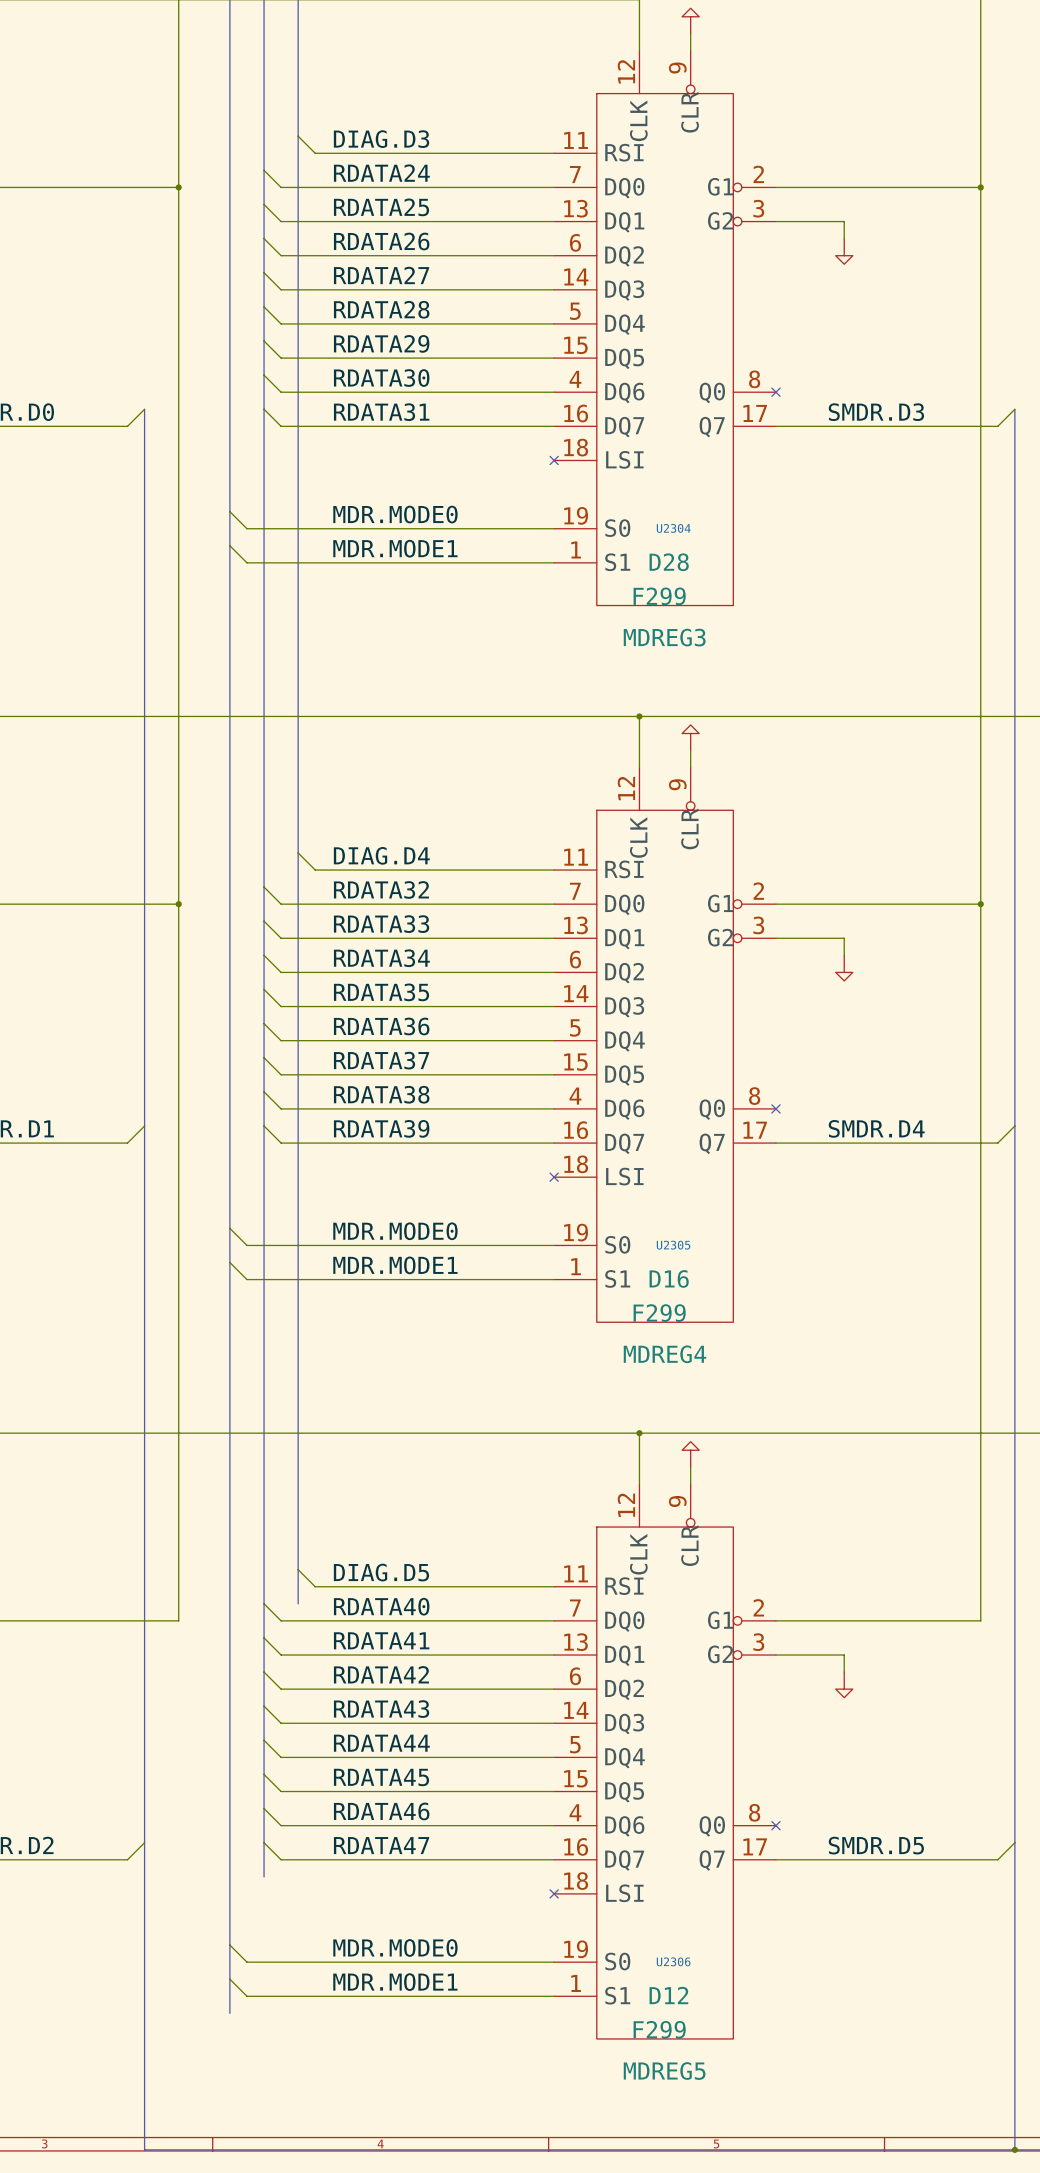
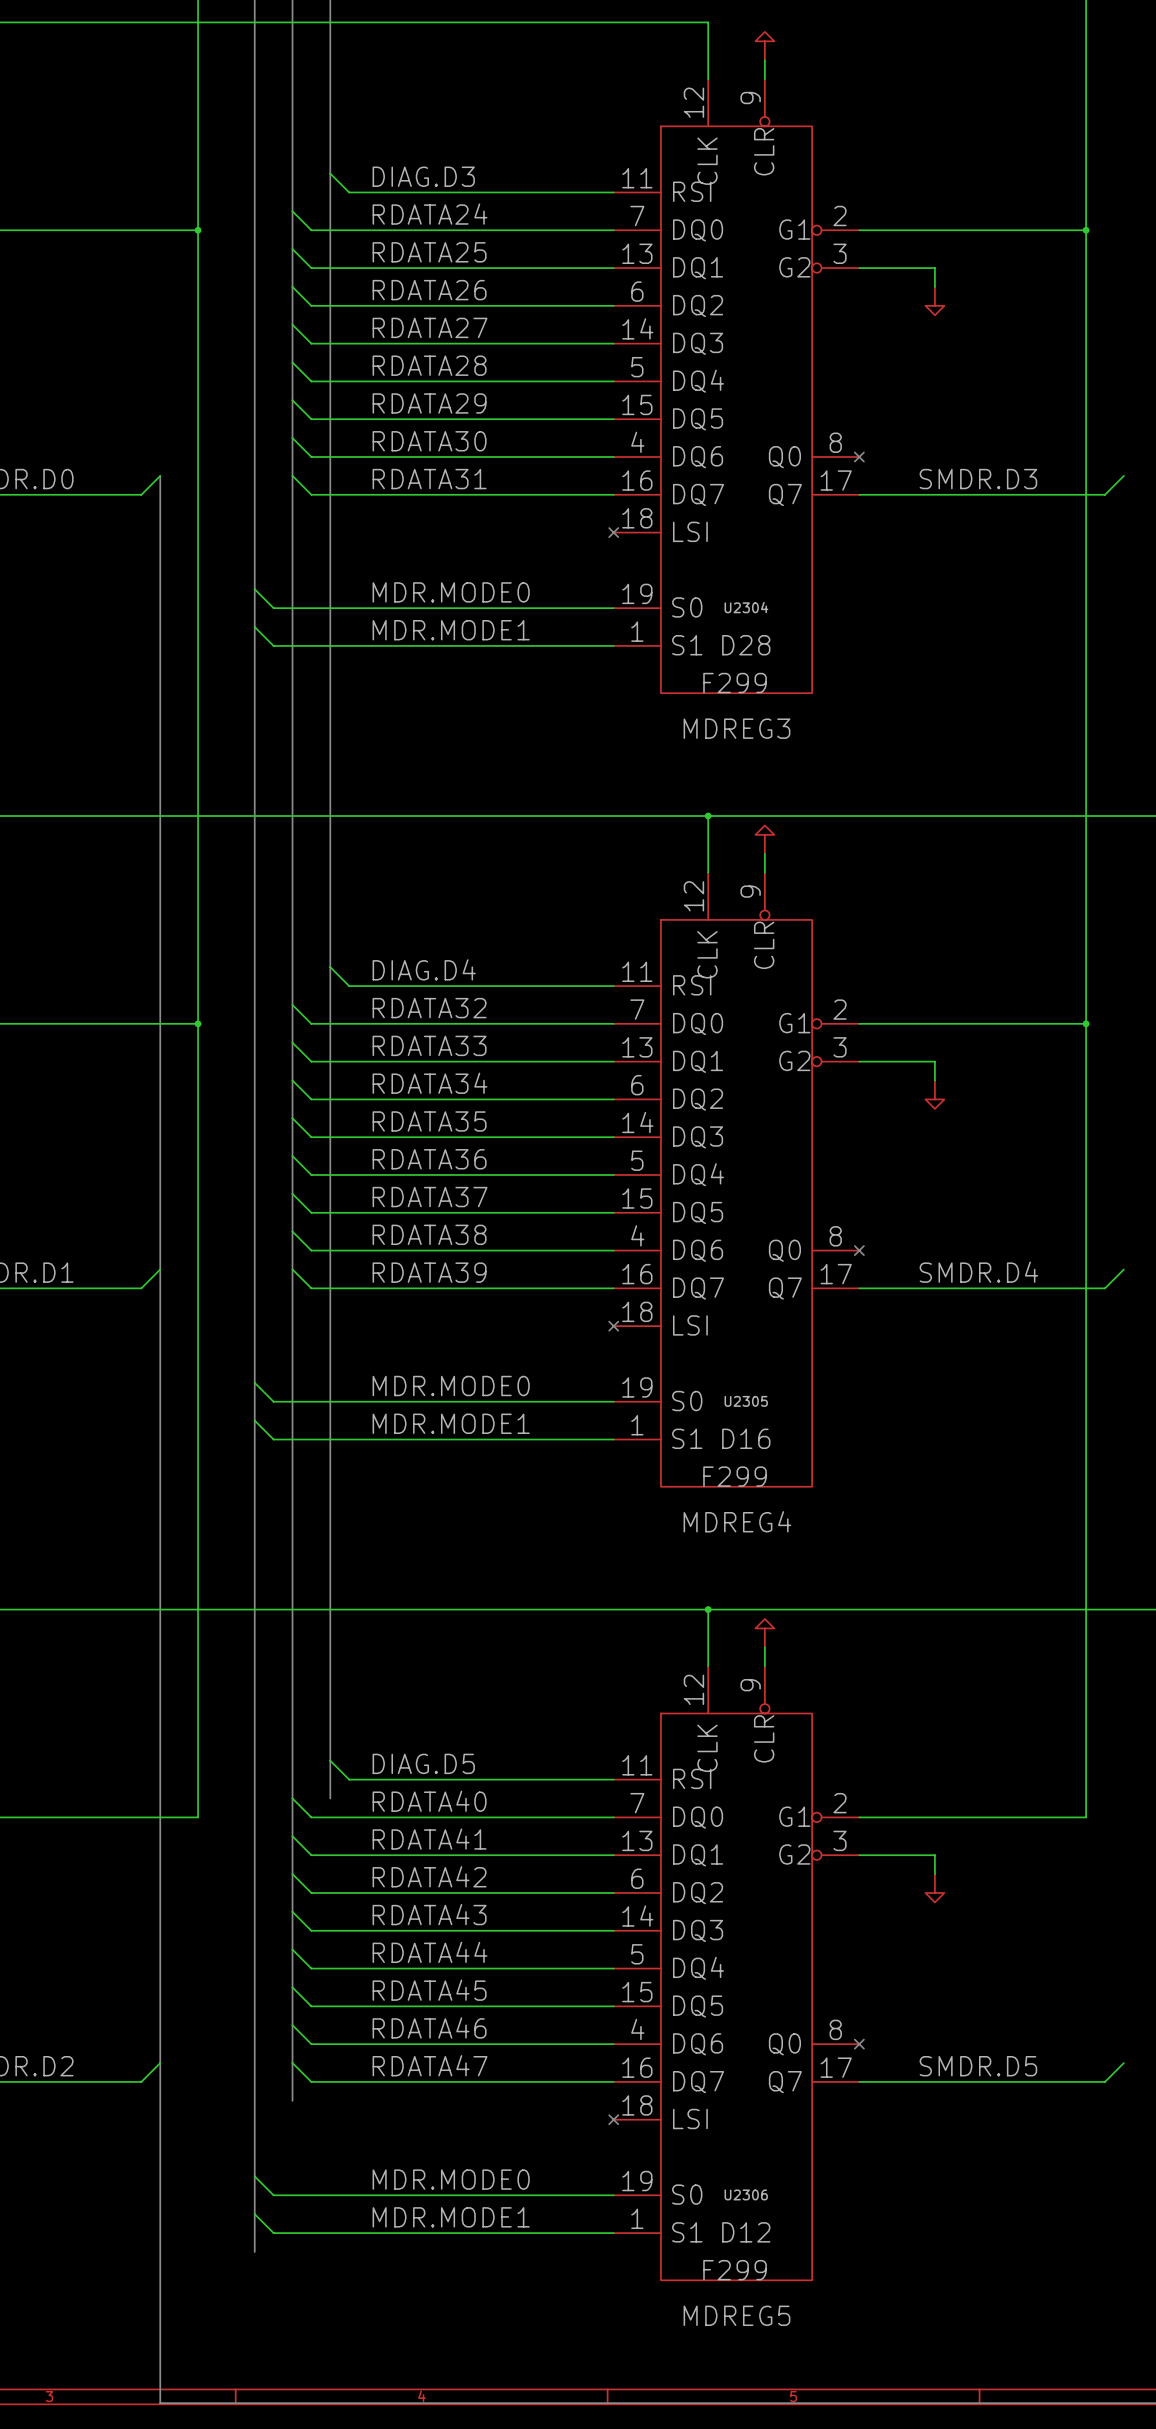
bus: (1014, 409) (1014, 2149) -> none
junction: (1014, 2149) -> none

